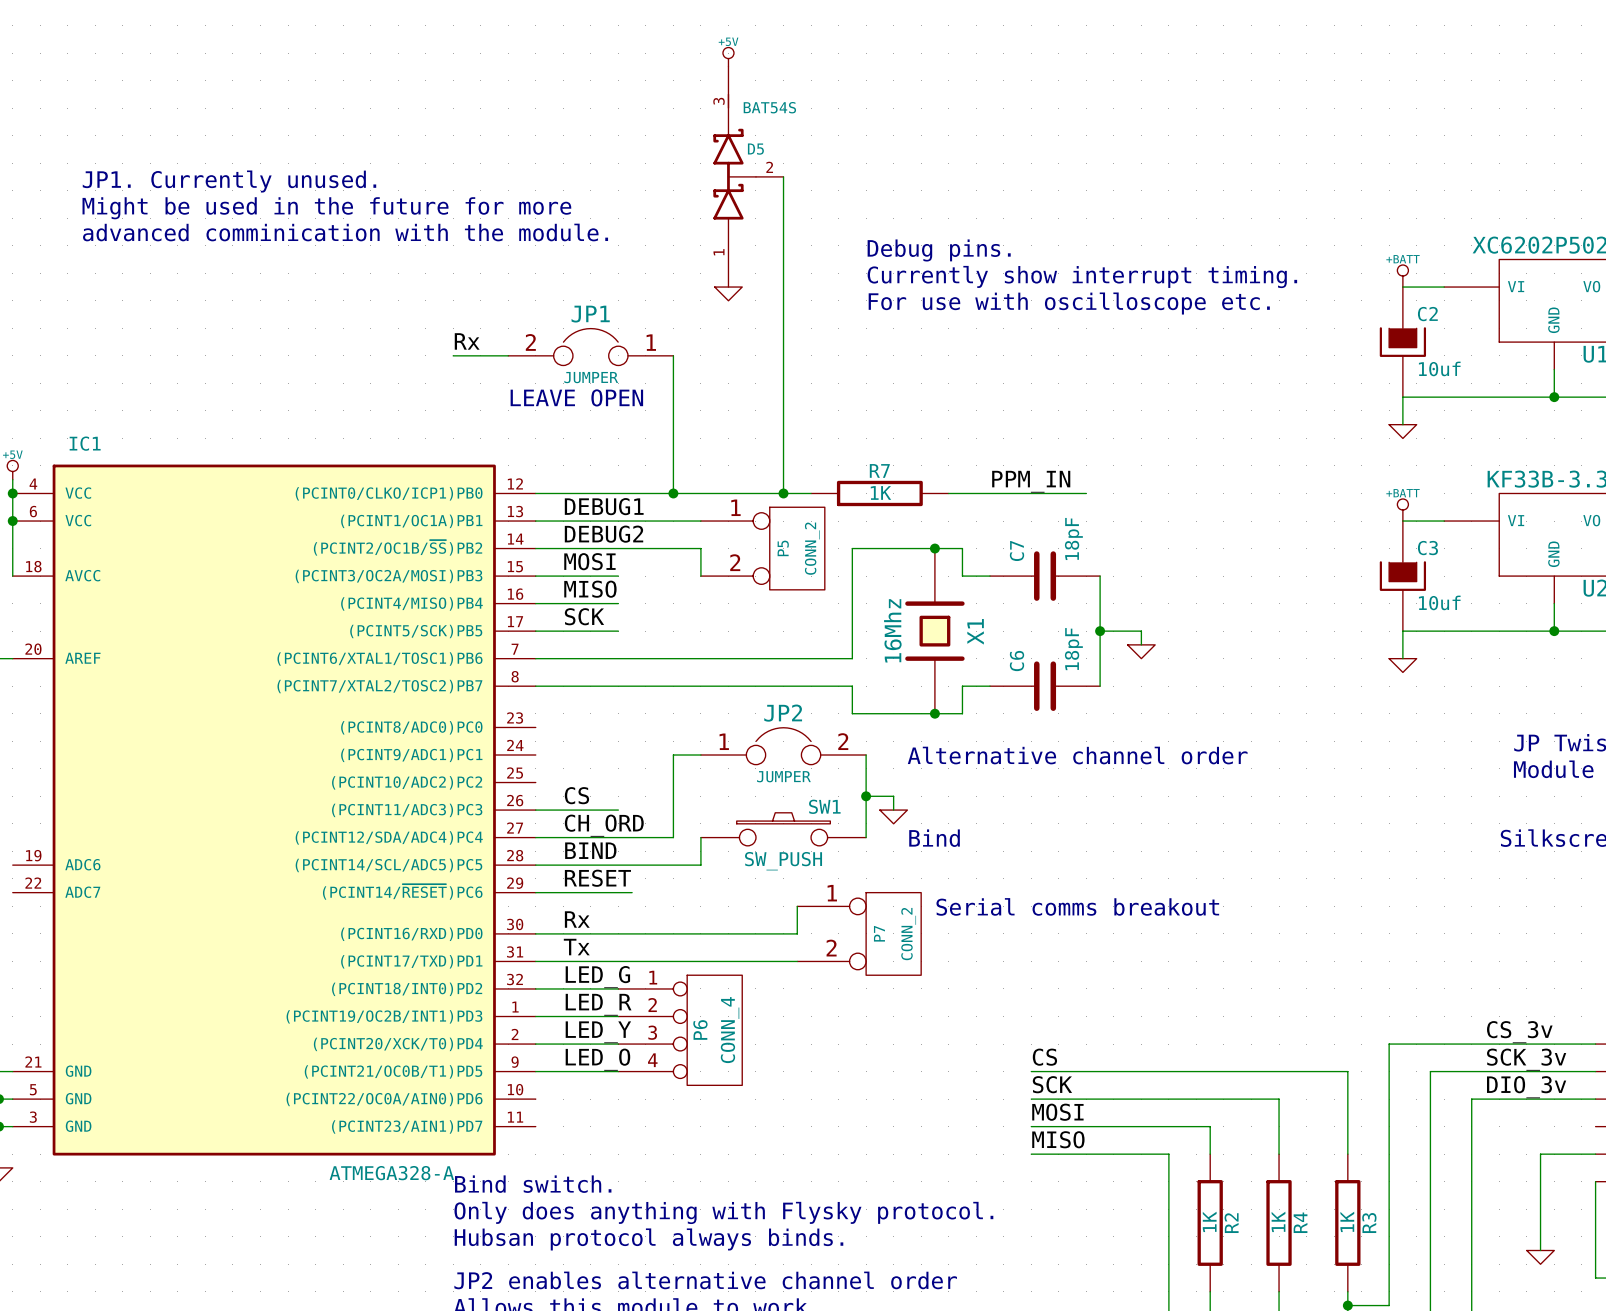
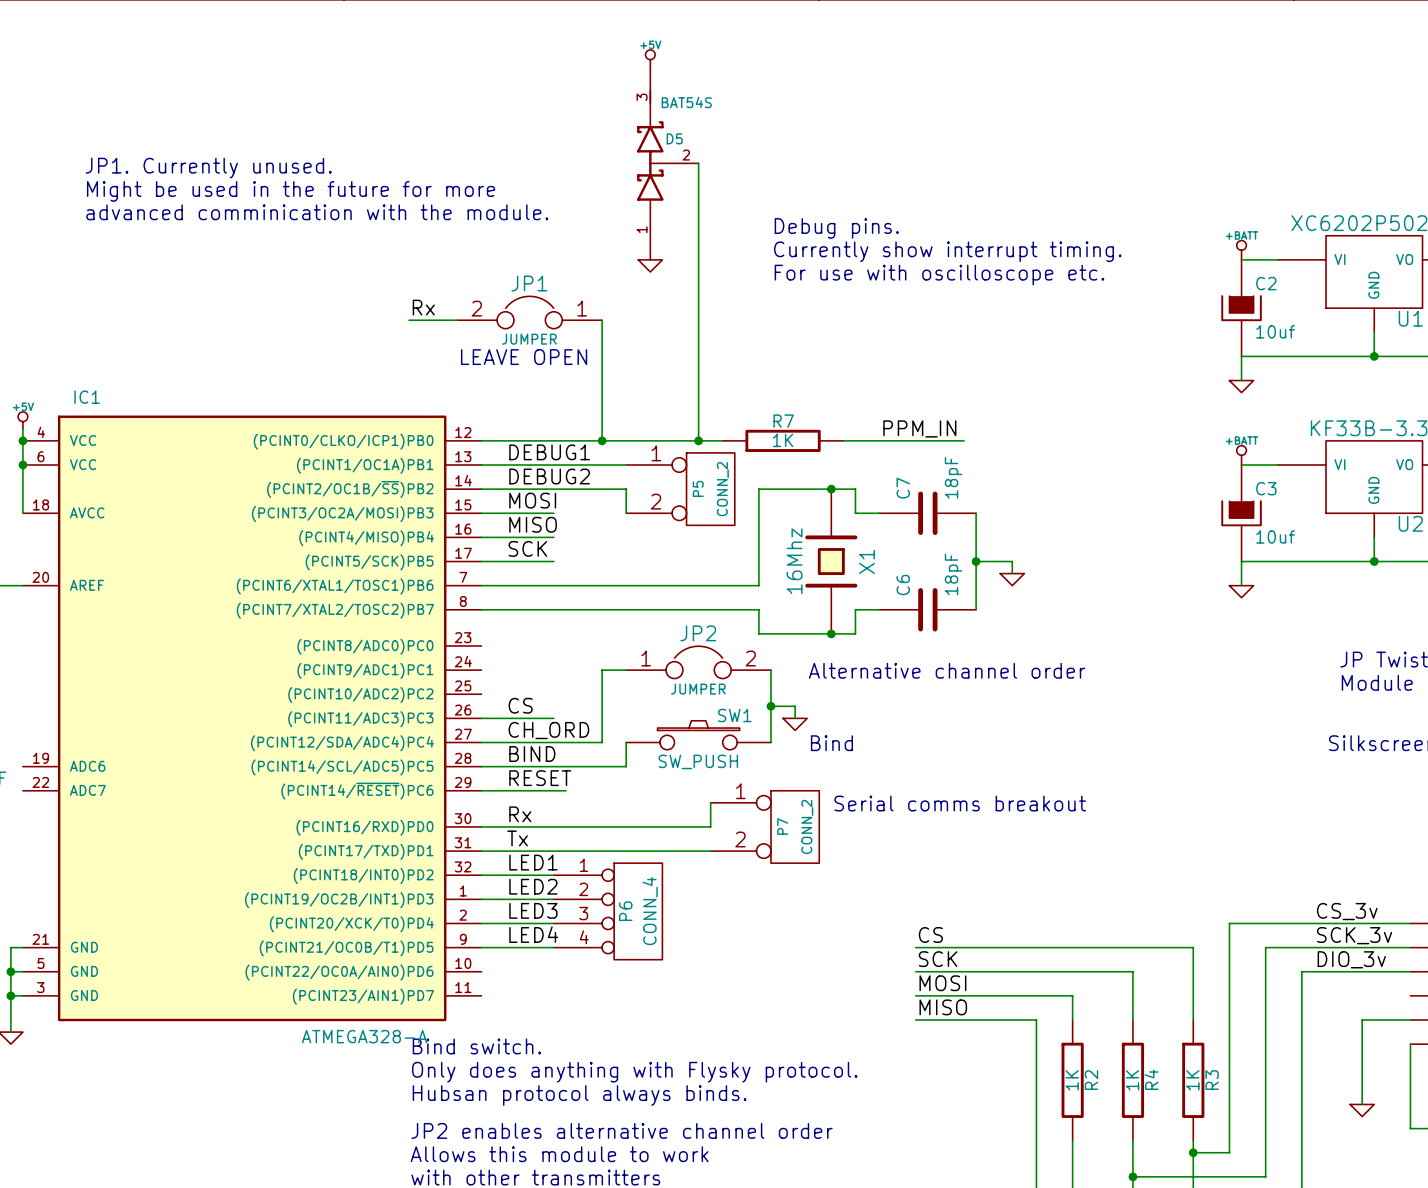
label: LED_G (597, 977) -> LED1 (533, 862)
label: LED_R (598, 1004) -> LED2 (533, 886)
label: LED_Y (598, 1032) -> LED3 (533, 910)
label: LED_O (597, 1059) -> LED4 (533, 934)

